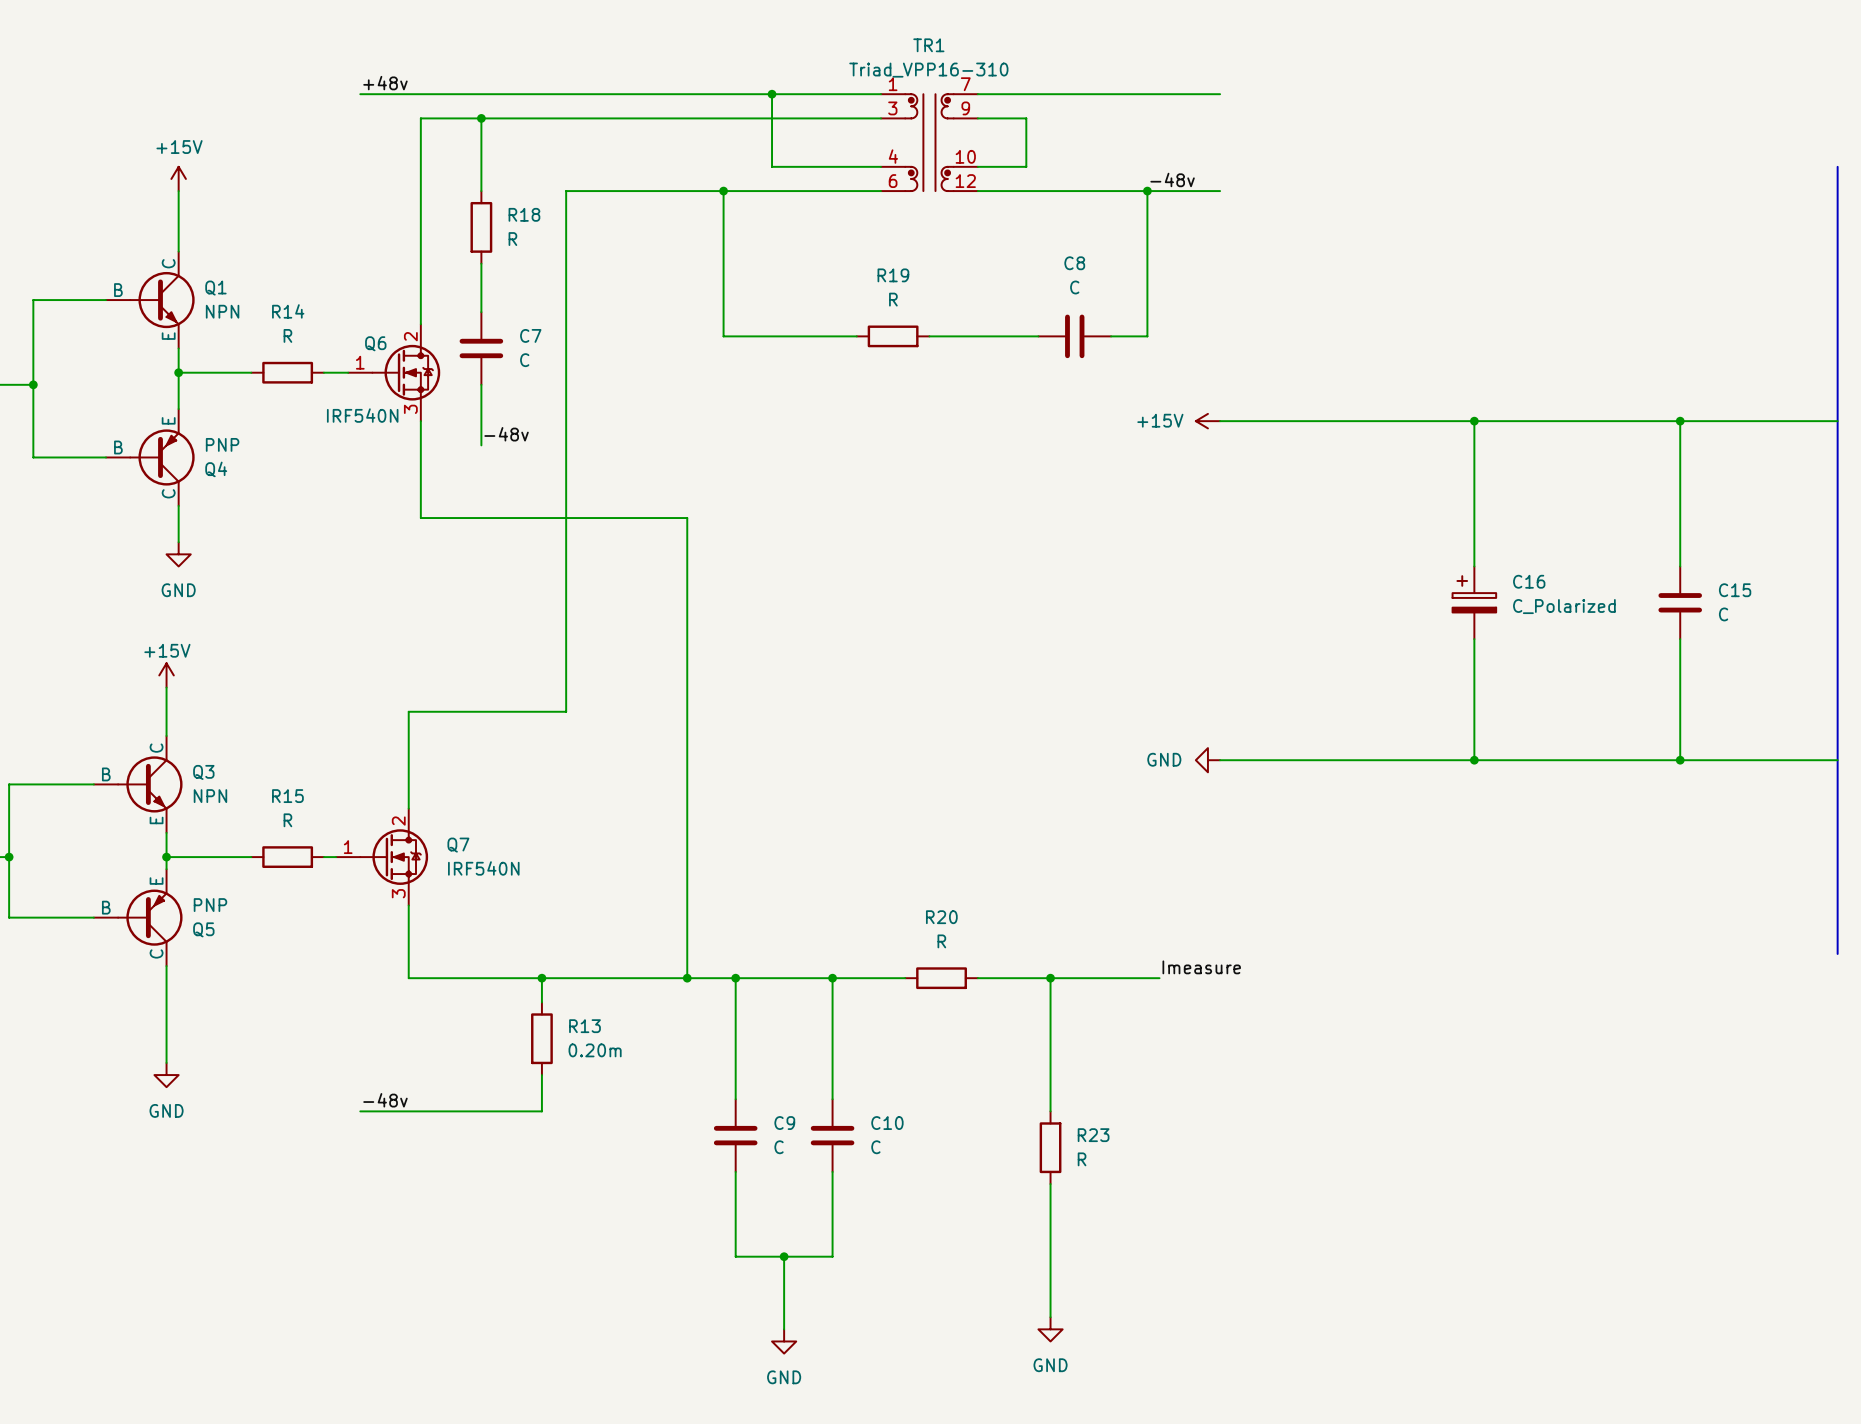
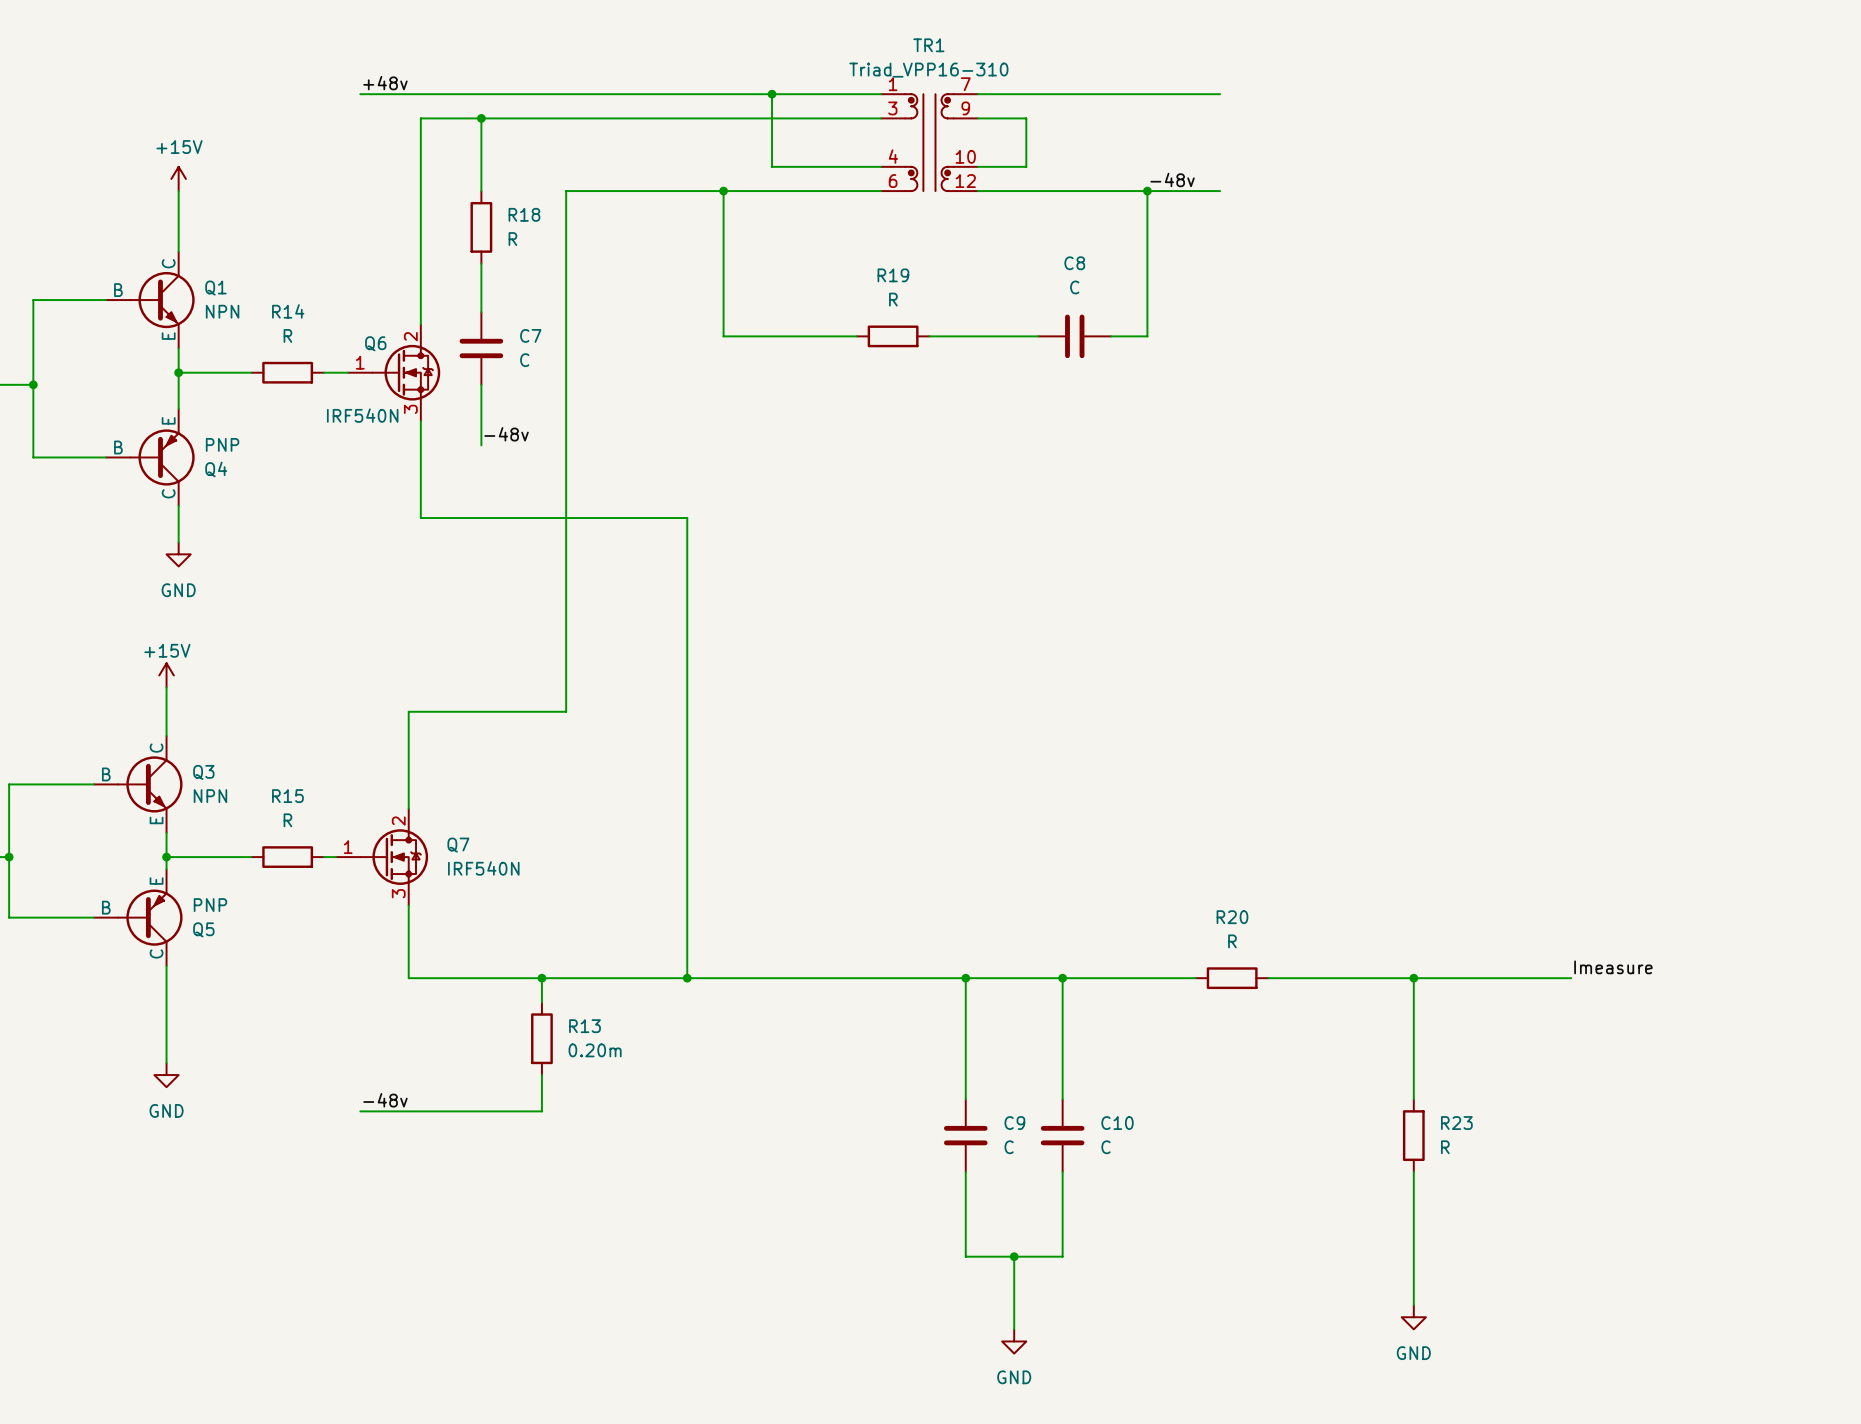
bus: (1837, 166) (1837, 953) -> none
power symbol: +15V (1207, 421) -> none
wire: (1220, 421) (1837, 421) -> none
wire: (1474, 421) (1474, 566) -> none
junction: (1474, 421) -> none
wire: (1680, 421) (1680, 566) -> none
junction: (1680, 421) -> none
C16: C_Polarized (1474, 602) -> none
C15: C (1680, 602) -> none
wire: (1474, 639) (1474, 760) -> none
wire: (1680, 639) (1680, 760) -> none
power symbol: GND (1207, 760) -> none
wire: (1220, 760) (1837, 760) -> none
junction: (1474, 760) -> none
junction: (1680, 760) -> none
label: Imeasure (1201, 967) -> none
label: none -> Imeasure (1613, 967)
wire: (735, 978) (735, 1099) -> (965, 978) (965, 1099)
junction: (735, 978) -> none
wire: (832, 978) (832, 1099) -> (1062, 978) (1062, 1099)
junction: (832, 978) -> none
wire: none -> (905, 978) (977, 978)
R20 position: (941, 978) -> (1232, 978)
junction: none -> (965, 978)
wire: (1050, 978) (1050, 1111) -> none
junction position: (1050, 978) -> (1062, 978)
wire: none -> (1159, 978) (1195, 978)
wire: none -> (1268, 978) (1571, 978)
wire: none -> (1413, 978) (1413, 1099)
junction: none -> (1413, 978)
C9 position: (735, 1135) -> (965, 1135)
C10 position: (832, 1135) -> (1062, 1135)
R23 position: (1050, 1147) -> (1413, 1135)
wire: (735, 1171) (735, 1256) (832, 1256) (832, 1171) -> (965, 1171) (965, 1256) (1062, 1256) (1062, 1171)
wire: none -> (1413, 1171) (1413, 1305)
wire: (1050, 1184) (1050, 1317) -> none
wire: (784, 1256) (784, 1329) -> (1014, 1256) (1014, 1329)
junction: (784, 1256) -> none
junction: none -> (1014, 1256)
power symbol: none -> GND (1413, 1317)
power symbol position: GND (1050, 1329) -> GND (1014, 1341)
power symbol: GND (784, 1341) -> none

